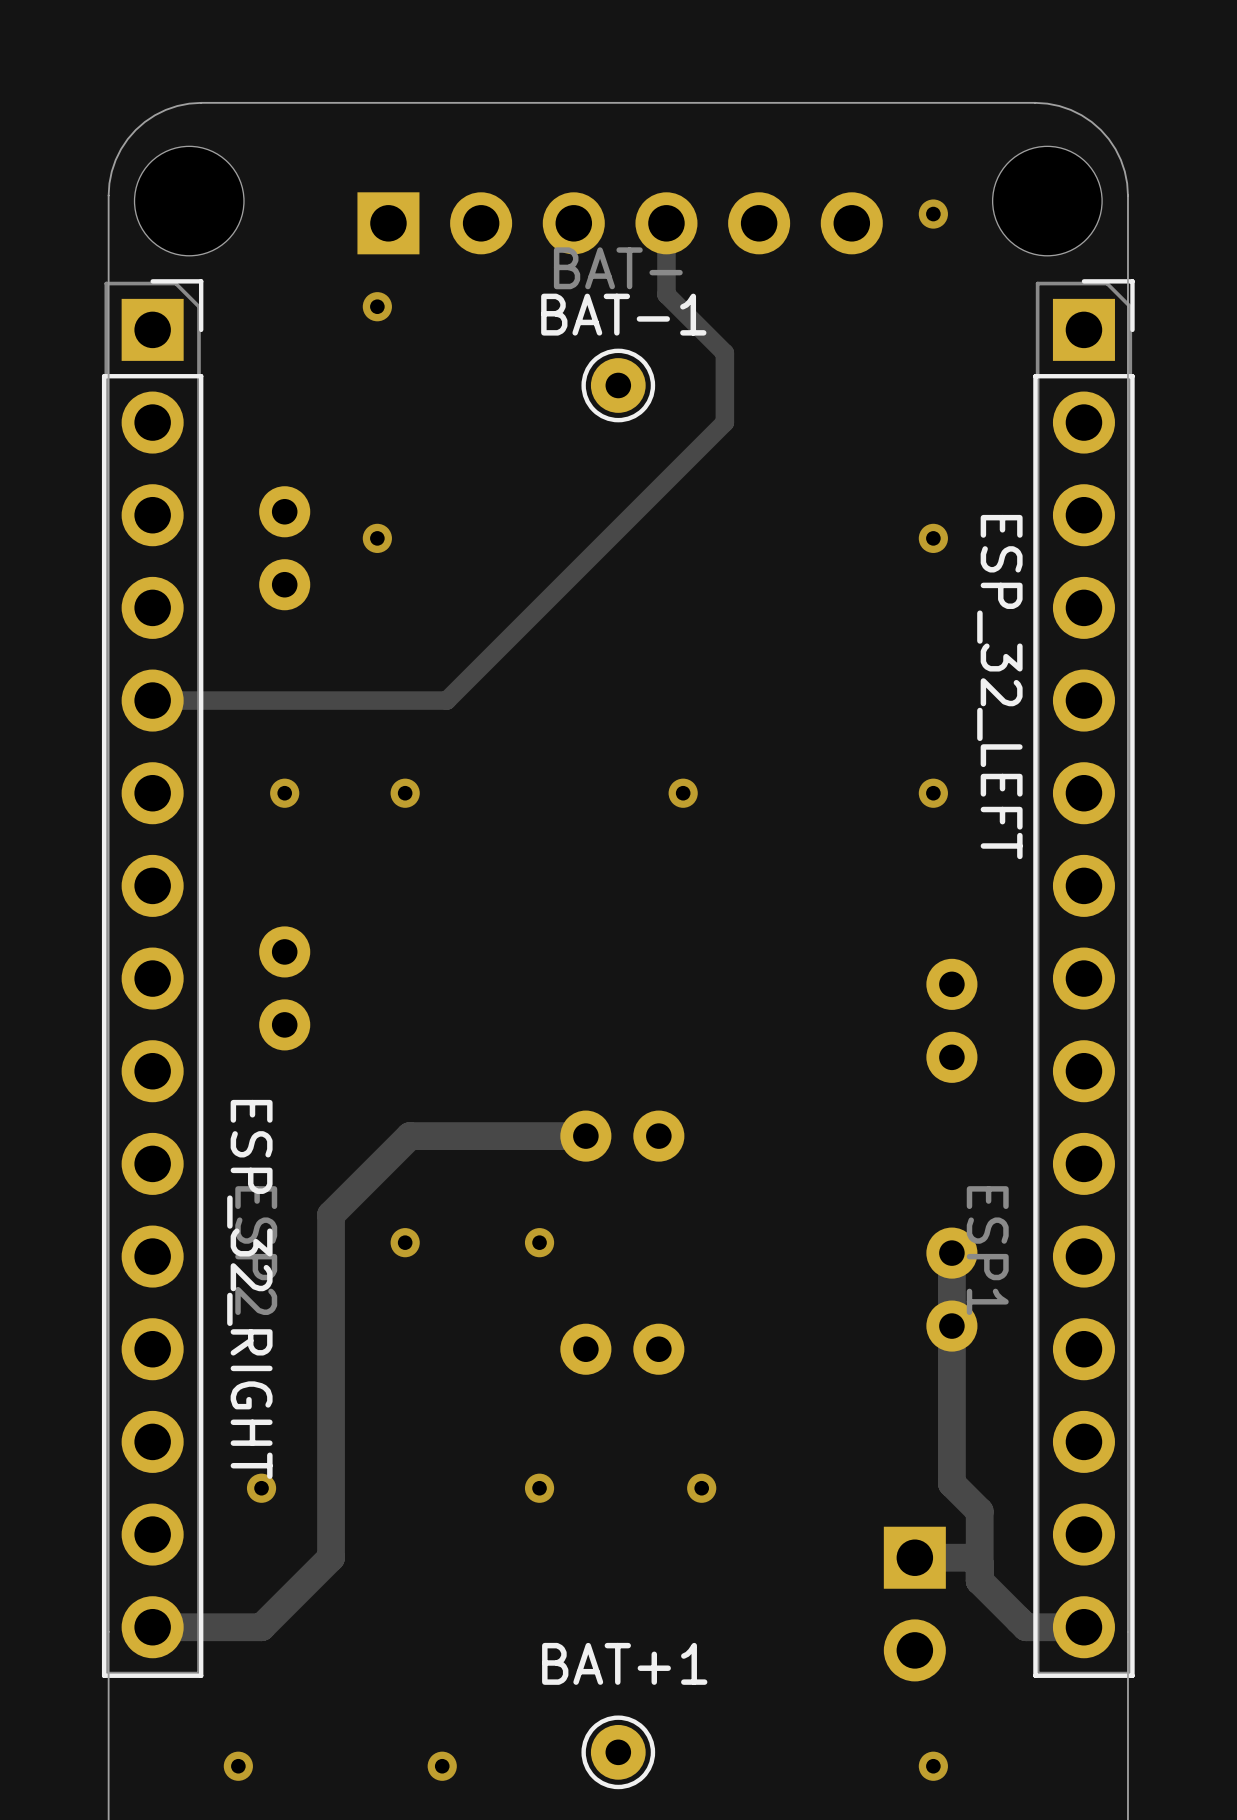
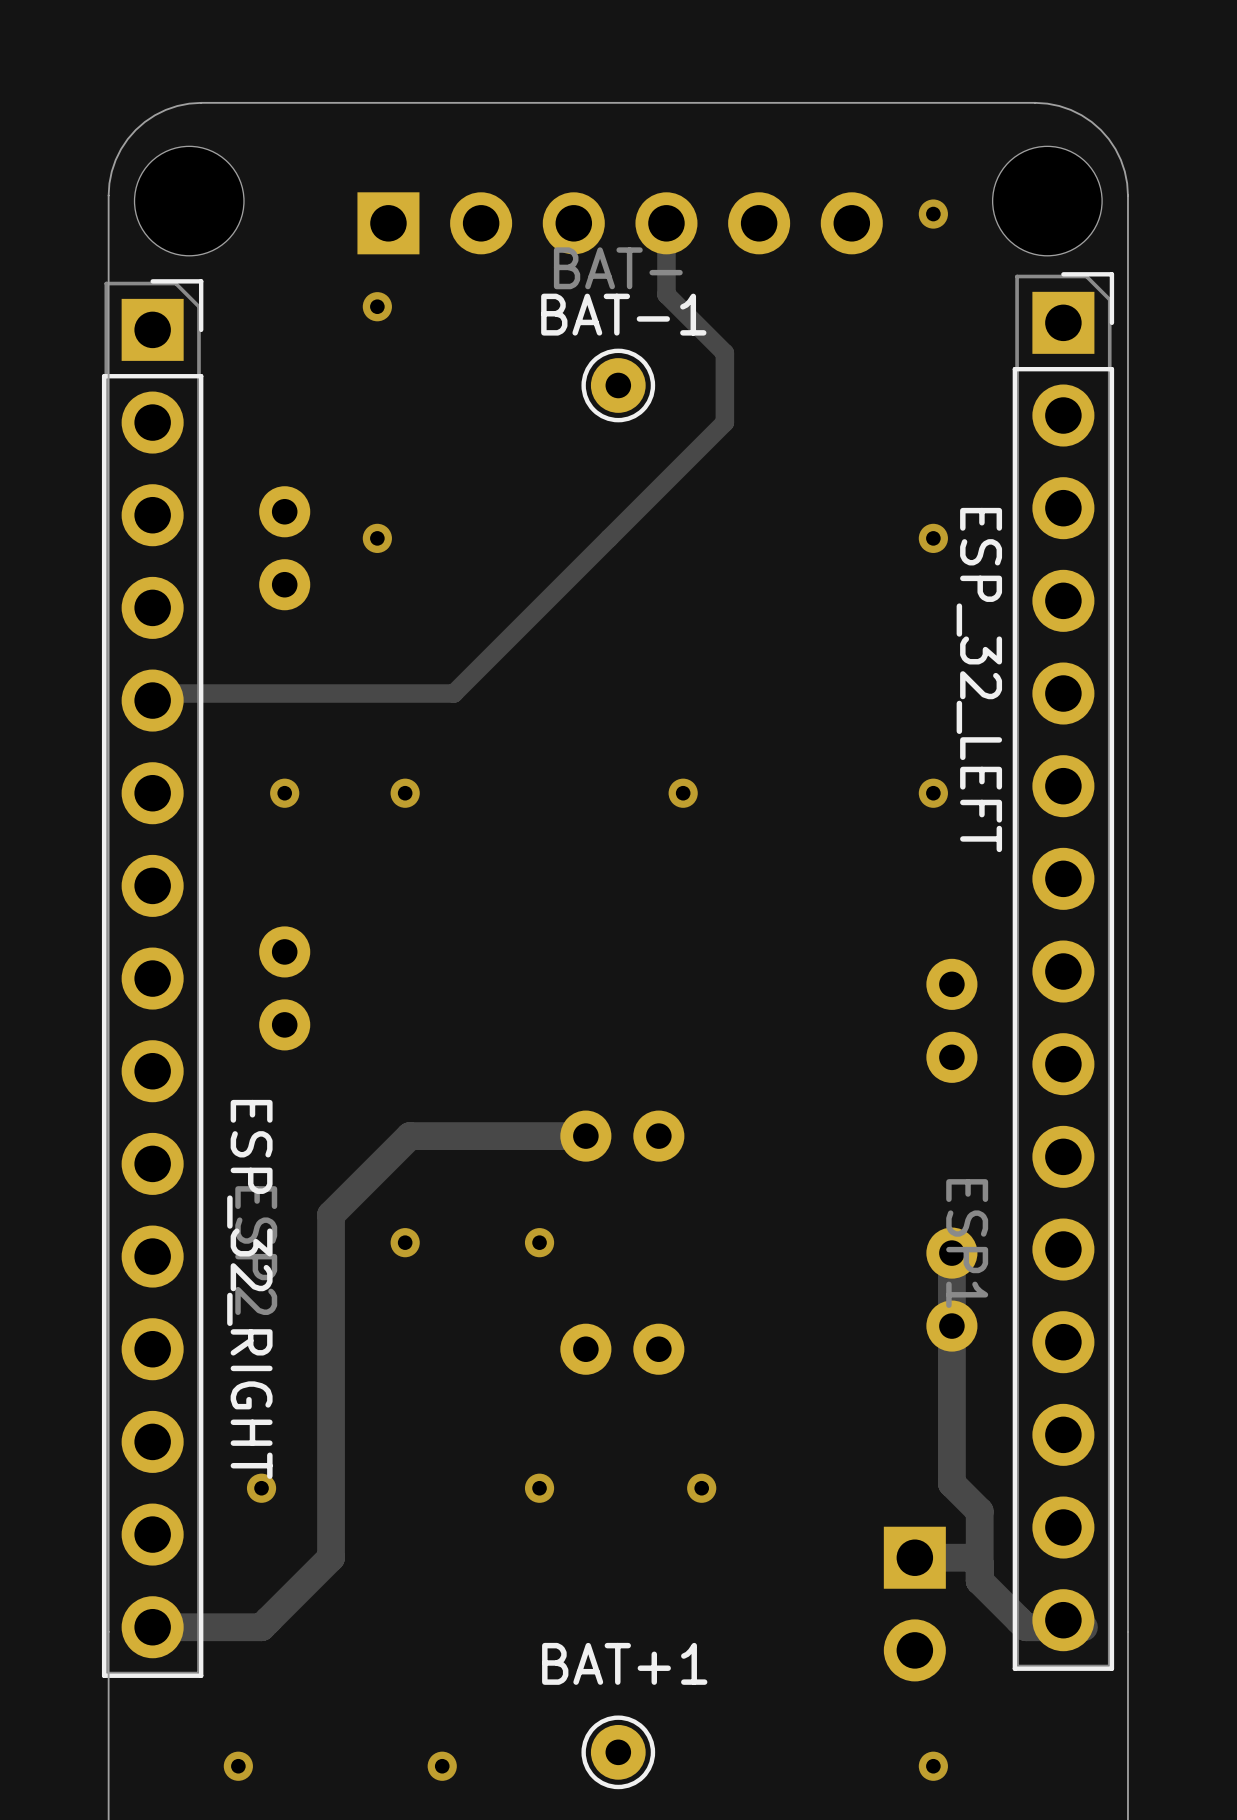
track: (453, 693) (446, 700) (152, 700) -> (453, 693) (173, 693)
ESP1 position: (1083, 978) -> (1063, 971)

